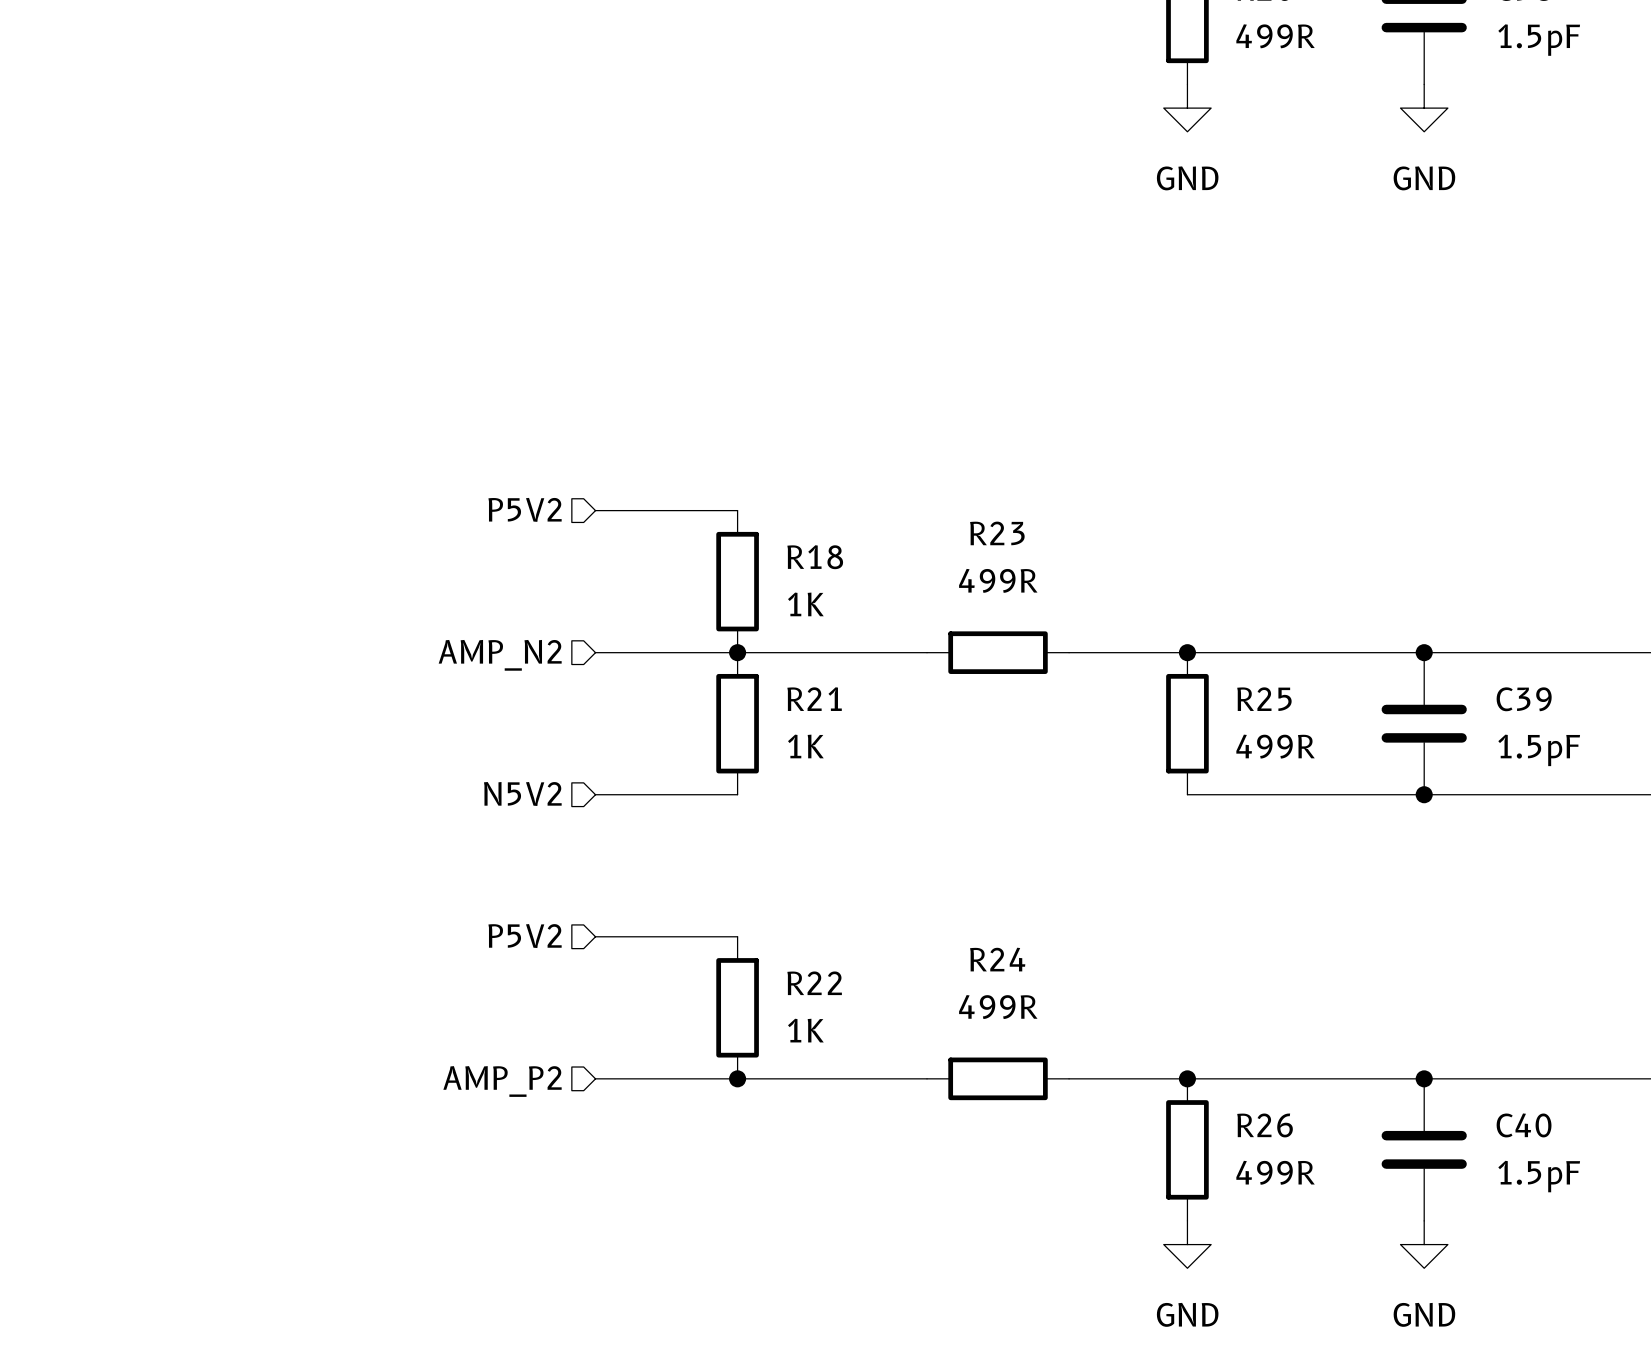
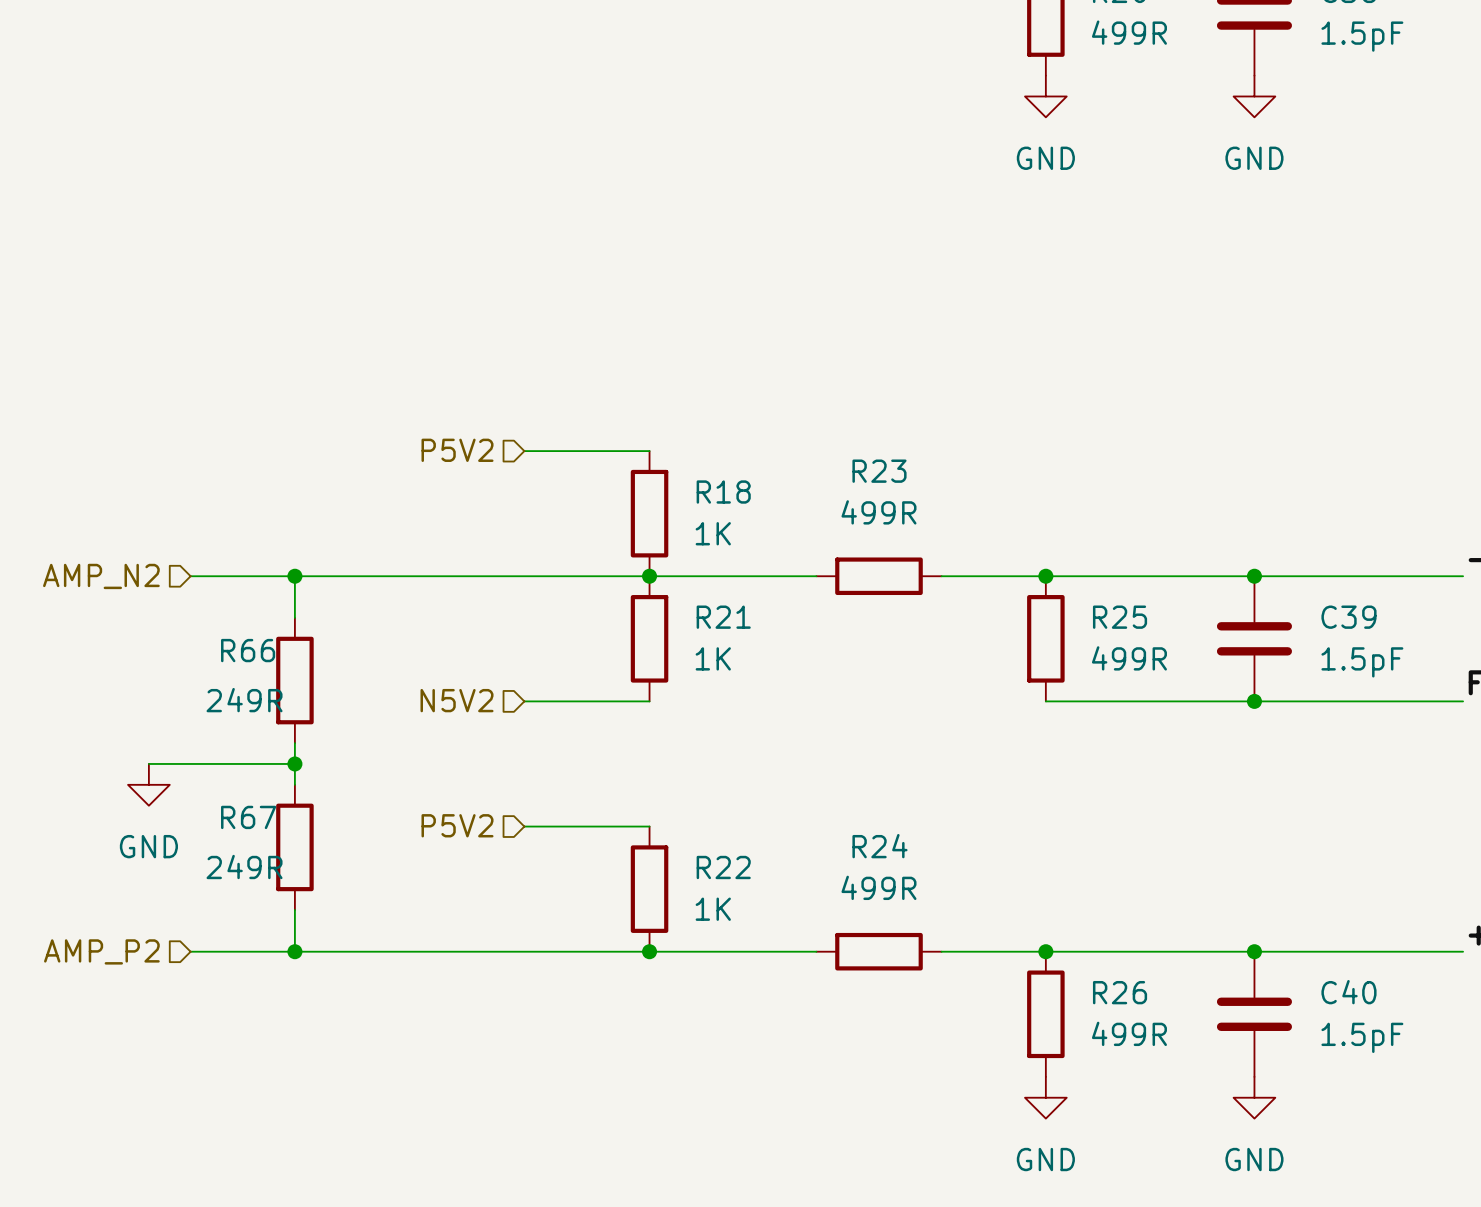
wire: none -> (190, 576) (524, 576)
wire: none -> (294, 576) (294, 617)
junction: none -> (294, 576)
hierarchical label position: AMP_N2 (500, 655) -> AMP_N2 (101, 576)
R66: none -> 249R (294, 680)
wire: none -> (294, 743) (294, 784)
wire: none -> (148, 763) (294, 763)
junction: none -> (294, 763)
power symbol: none -> GND (148, 784)
R67: none -> 249R (294, 847)
wire: none -> (294, 909) (294, 951)
wire: none -> (190, 951) (524, 951)
junction: none -> (294, 951)
hierarchical label position: AMP_P2 (502, 1081) -> AMP_P2 (101, 951)

